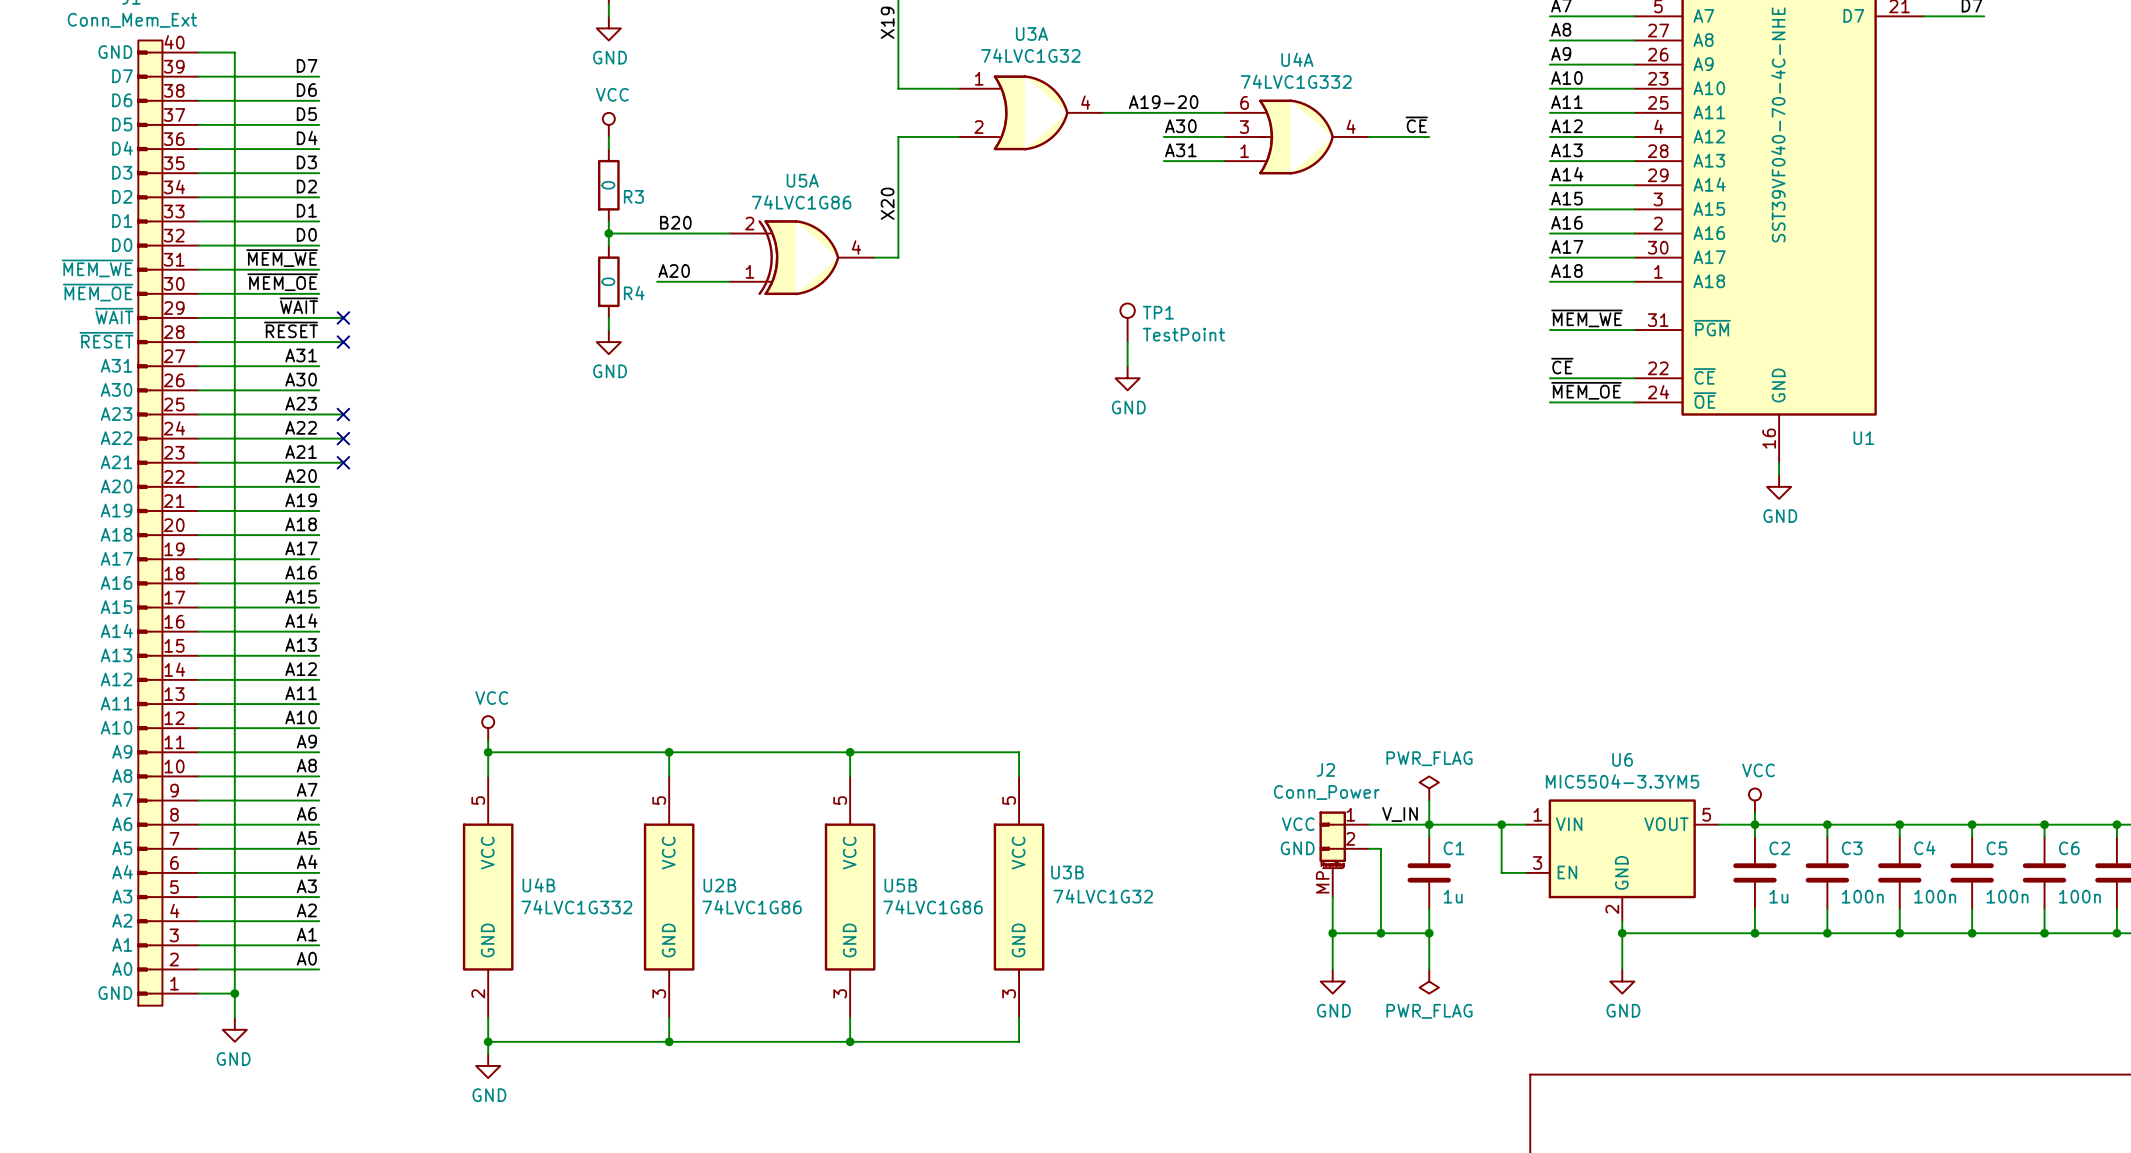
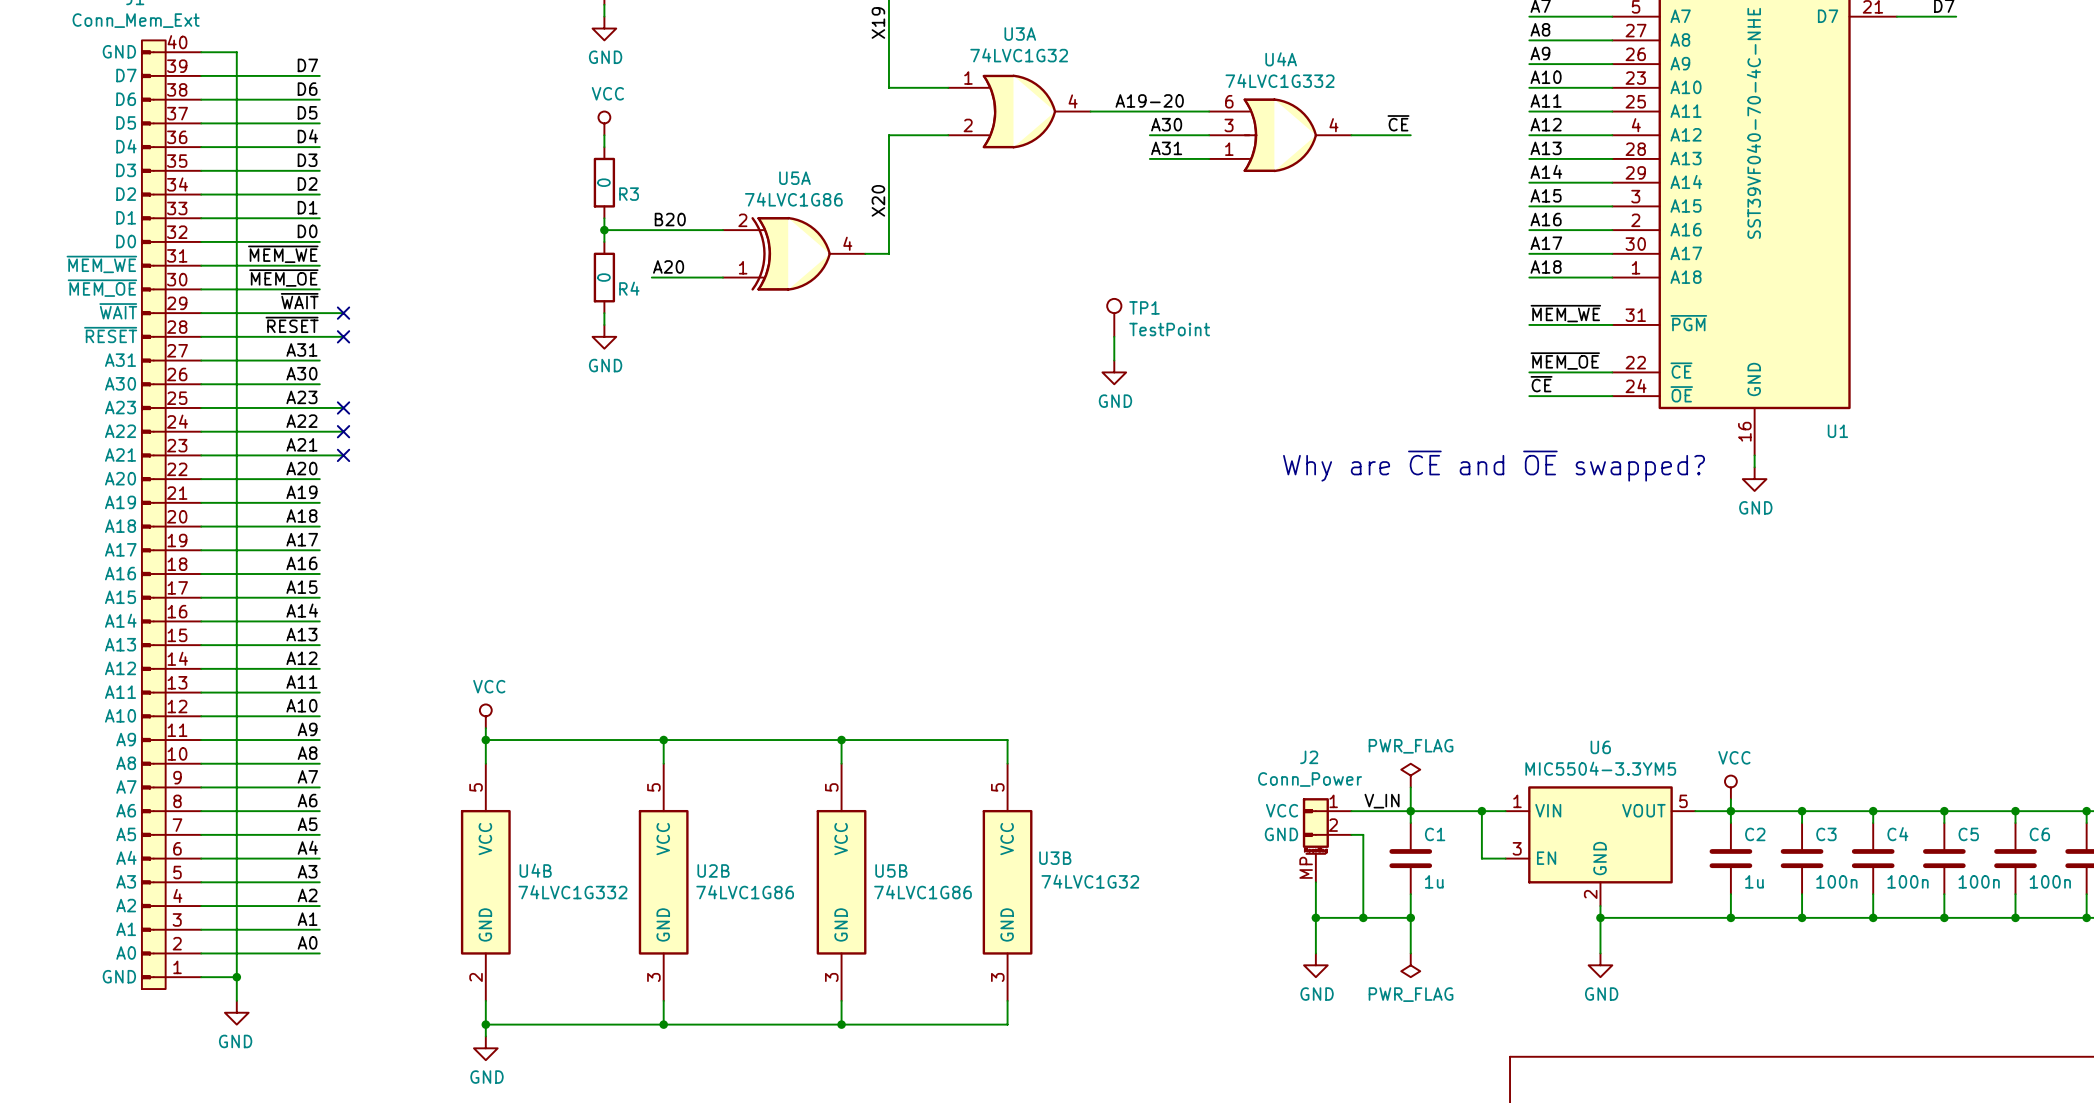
label: ~{CE} (1562, 366) -> ~{MEM_OE} (1565, 361)
label: ~{MEM_OE} (1586, 390) -> ~{CE} (1541, 384)
text: none -> Why are ~{CE} and ~{OE} swapped? (1494, 466)

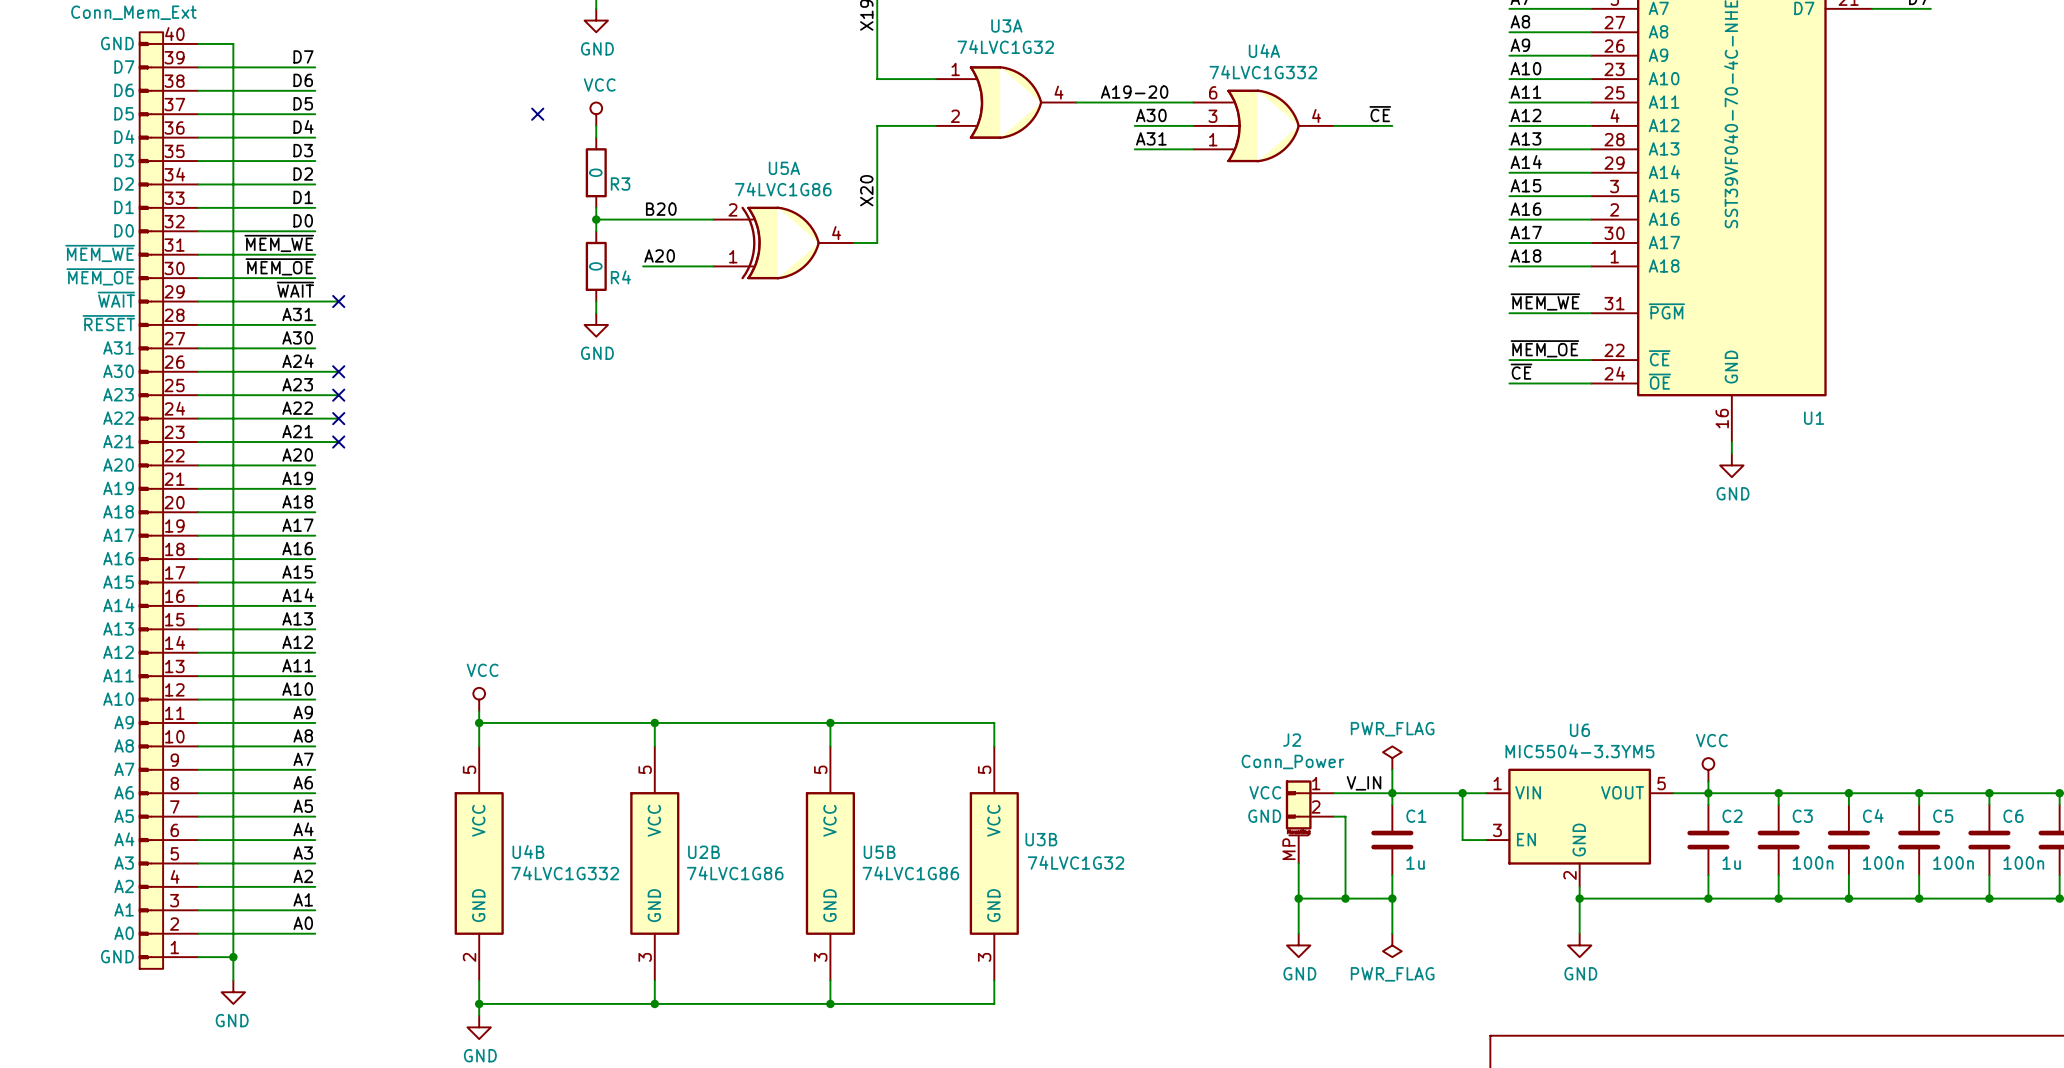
no-connect mark: none -> (537, 114)
TP1: TestPoint (1114, 317) -> none
label: ~{RESET} (292, 324) -> A31 (297, 314)
wire: (319, 336) (343, 336) -> (315, 371) (338, 371)
no-connect mark position: (343, 336) -> (338, 371)
wire: (1114, 336) (1114, 360) -> none
label: A31 (301, 349) -> A30 (297, 337)
power symbol: GND (1114, 372) -> none
label: A30 (301, 373) -> A24 (297, 361)
text: Why are ~{CE} and ~{OE} swapped? (1494, 466) -> none

